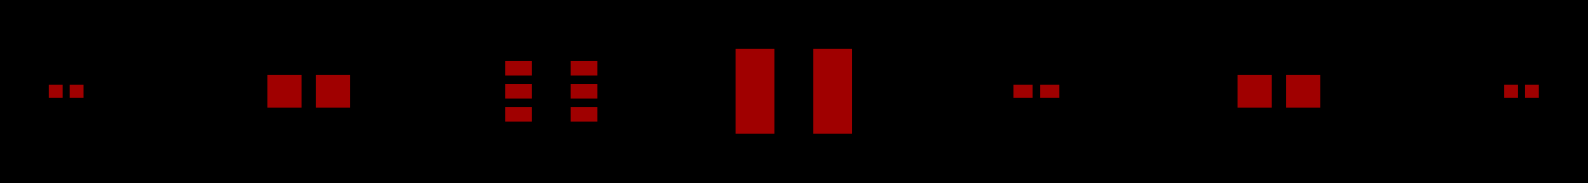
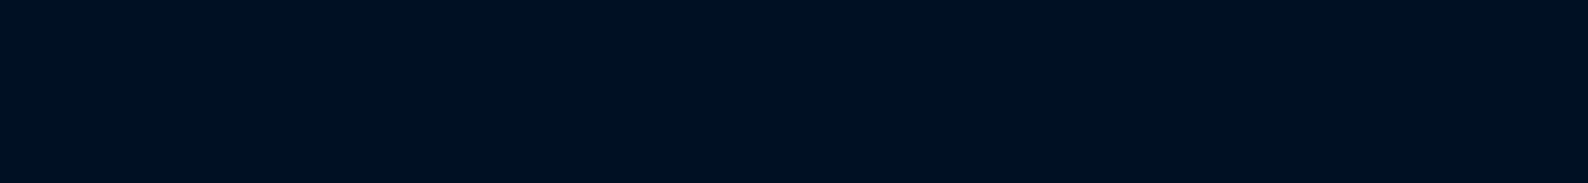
part: (66, 91) -> none
part: (308, 91) -> none
part: (551, 91) -> none
part: (793, 91) -> none
part: (1036, 91) -> none
part: (1278, 91) -> none
part: (1521, 91) -> none

